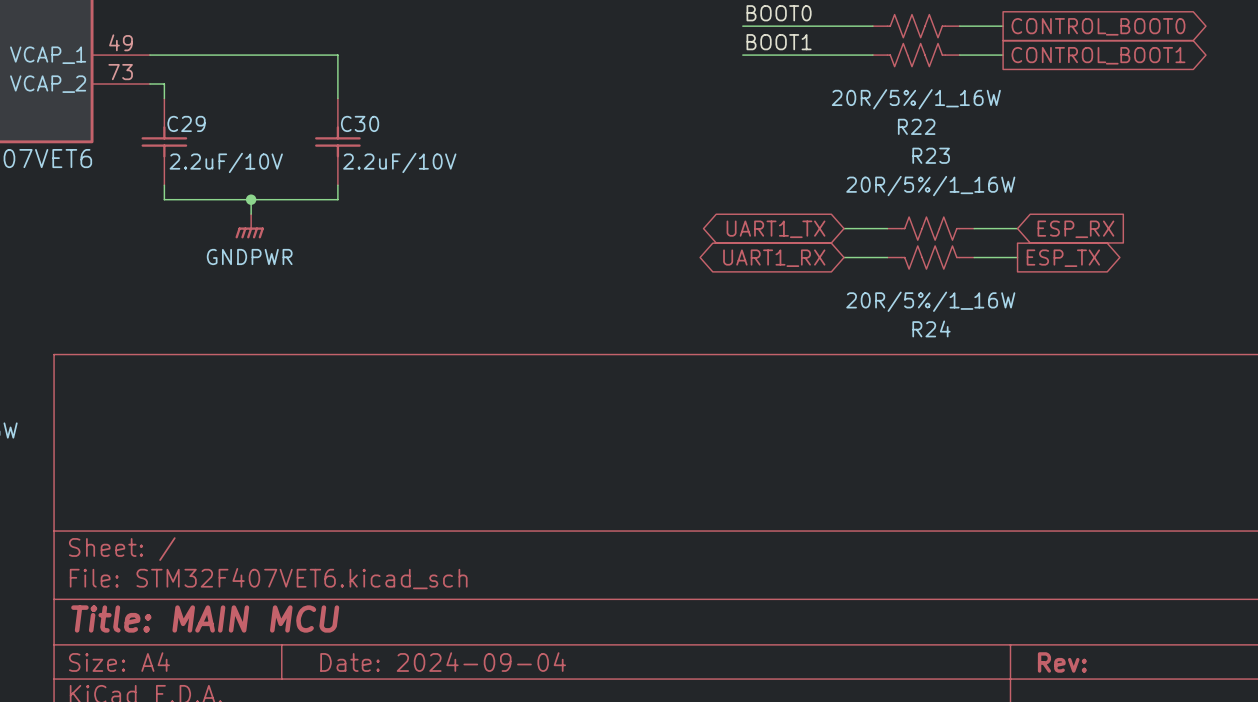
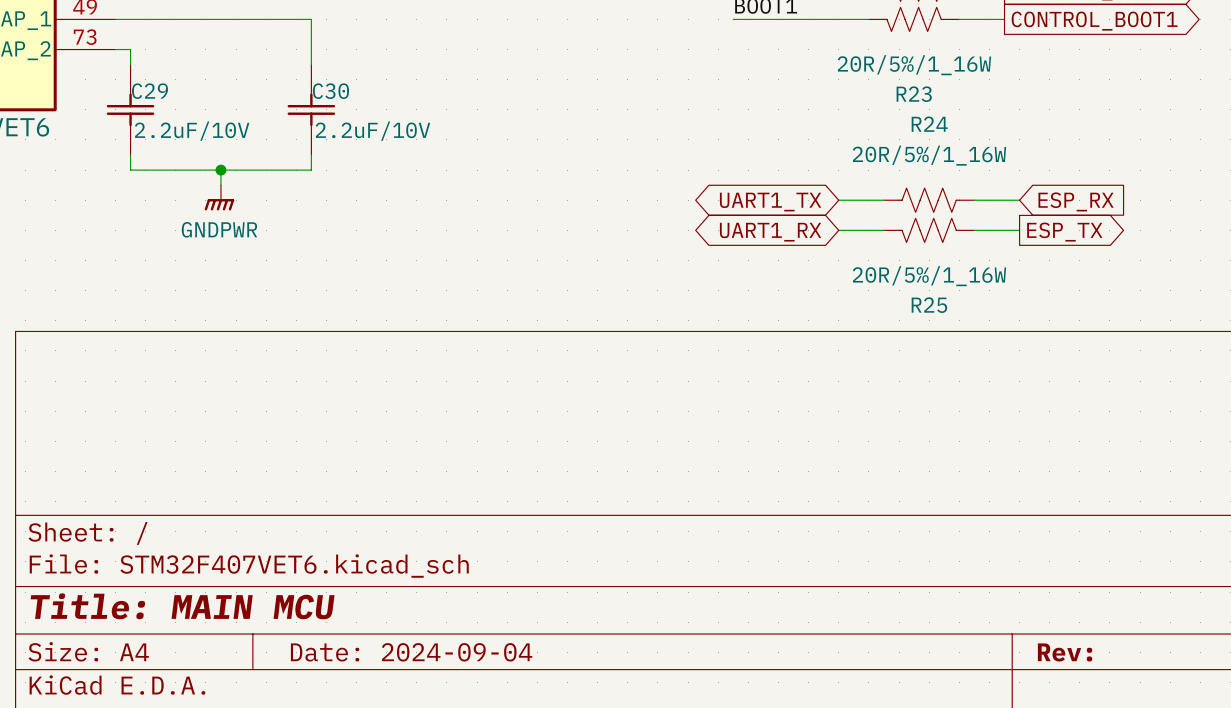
R22 name: R22 (916, 126) -> R23 (914, 94)
R23 name: R23 (931, 155) -> R24 (929, 124)
R24 name: R24 (931, 328) -> R25 (929, 305)

